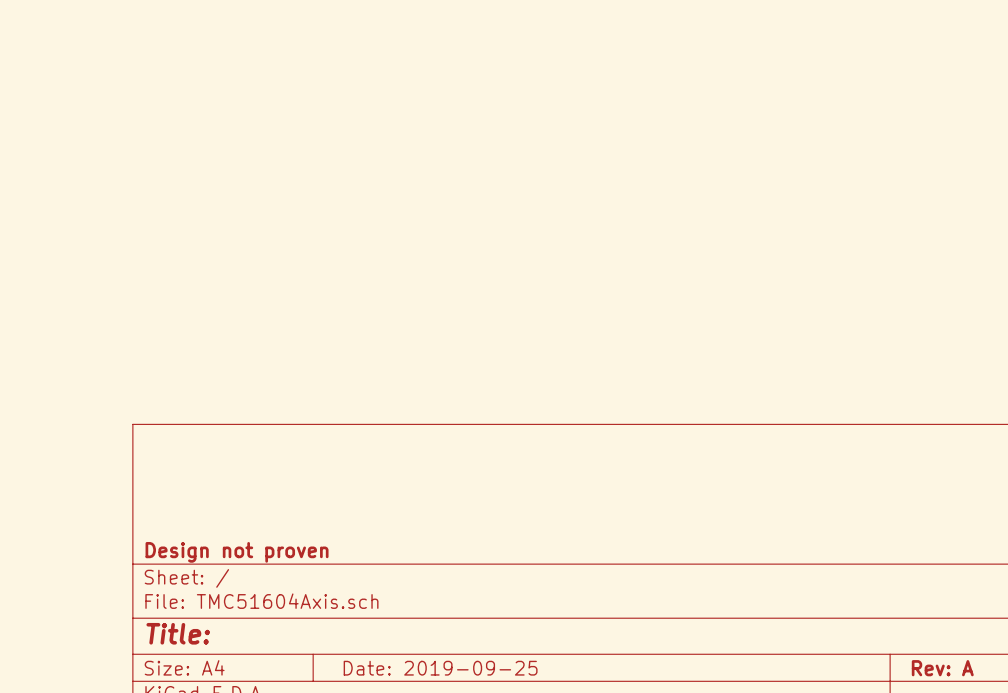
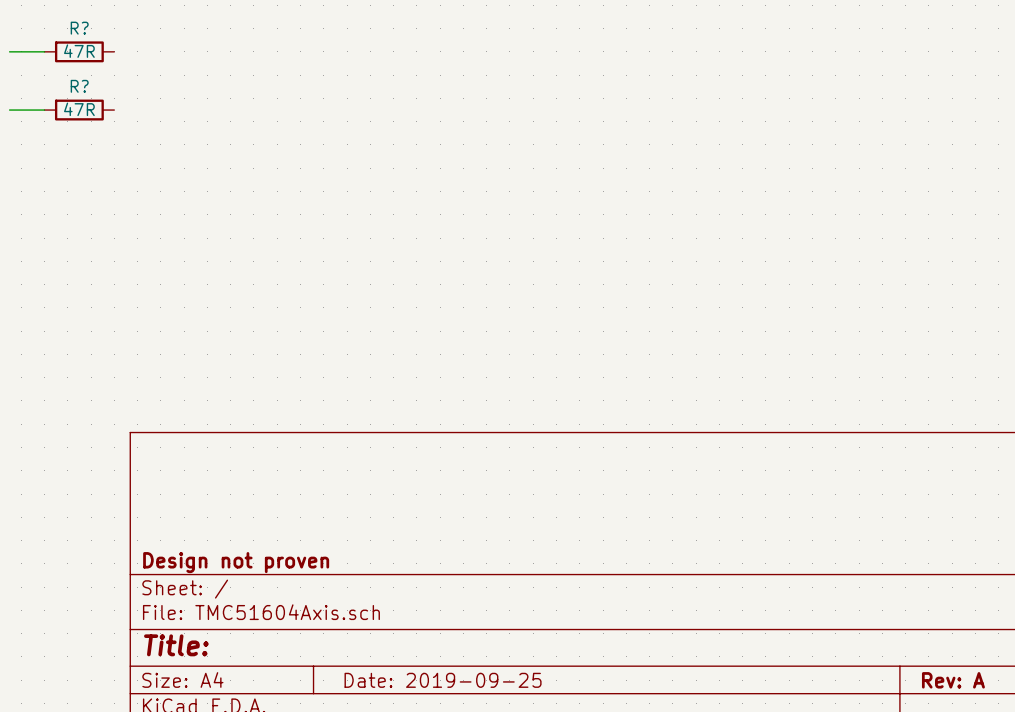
wire: none -> (9, 51) (44, 51)
R?: none -> 47R (79, 51)
wire: none -> (9, 110) (44, 110)
R?: none -> 47R (79, 110)

